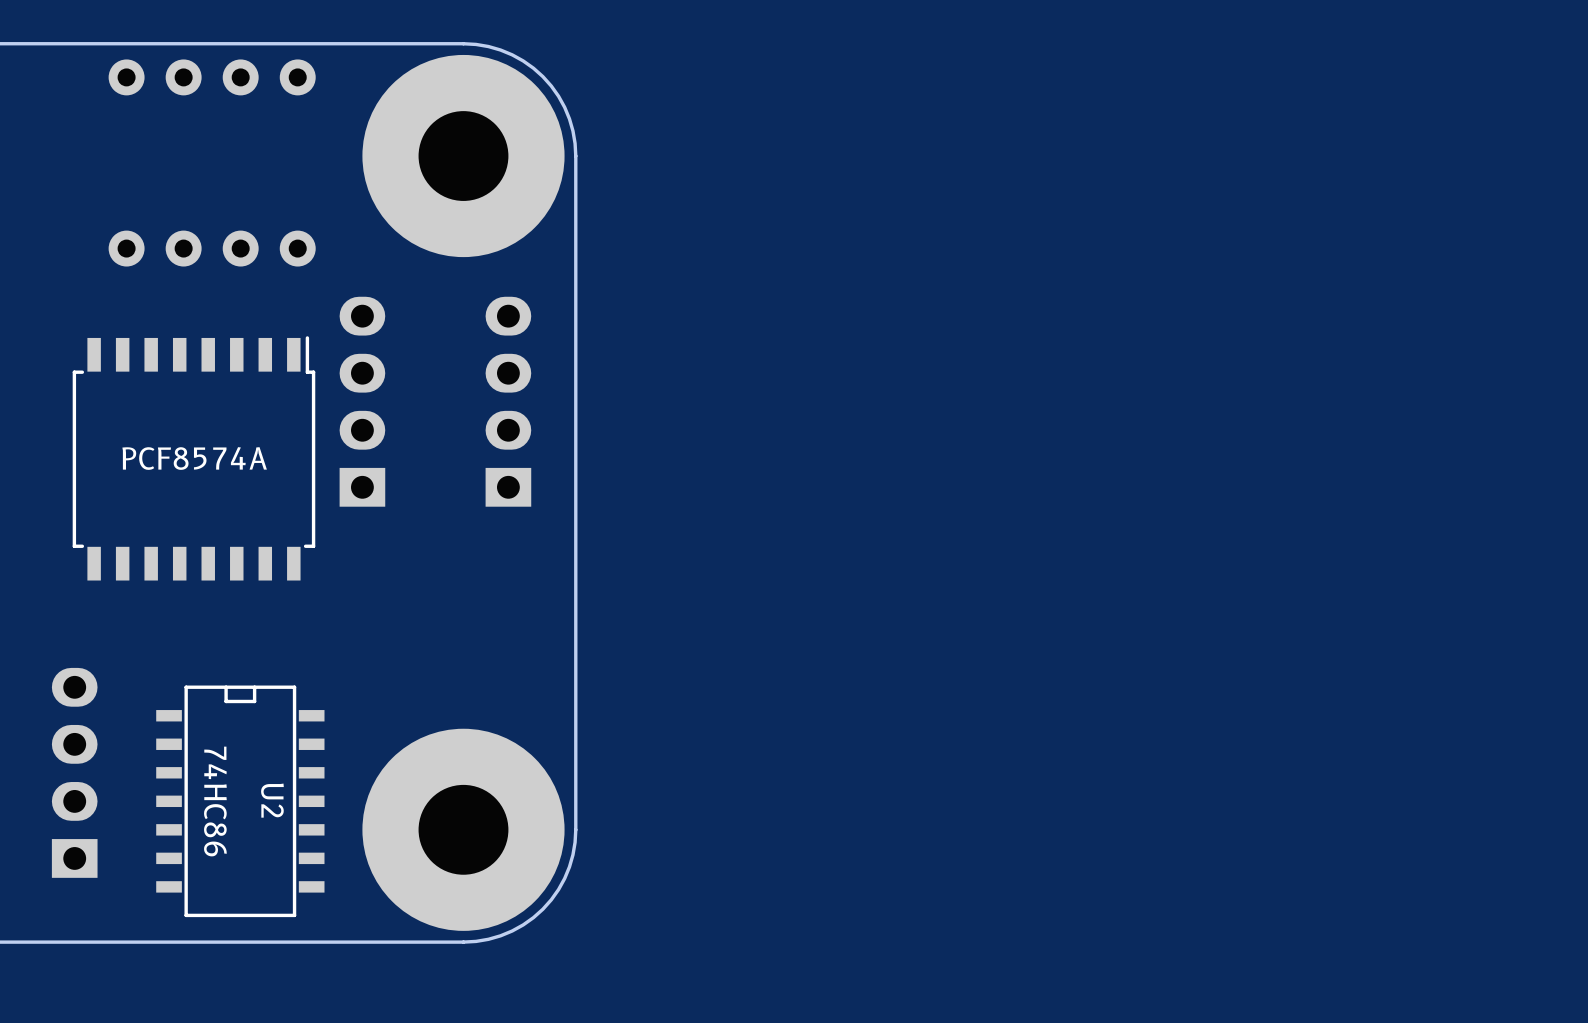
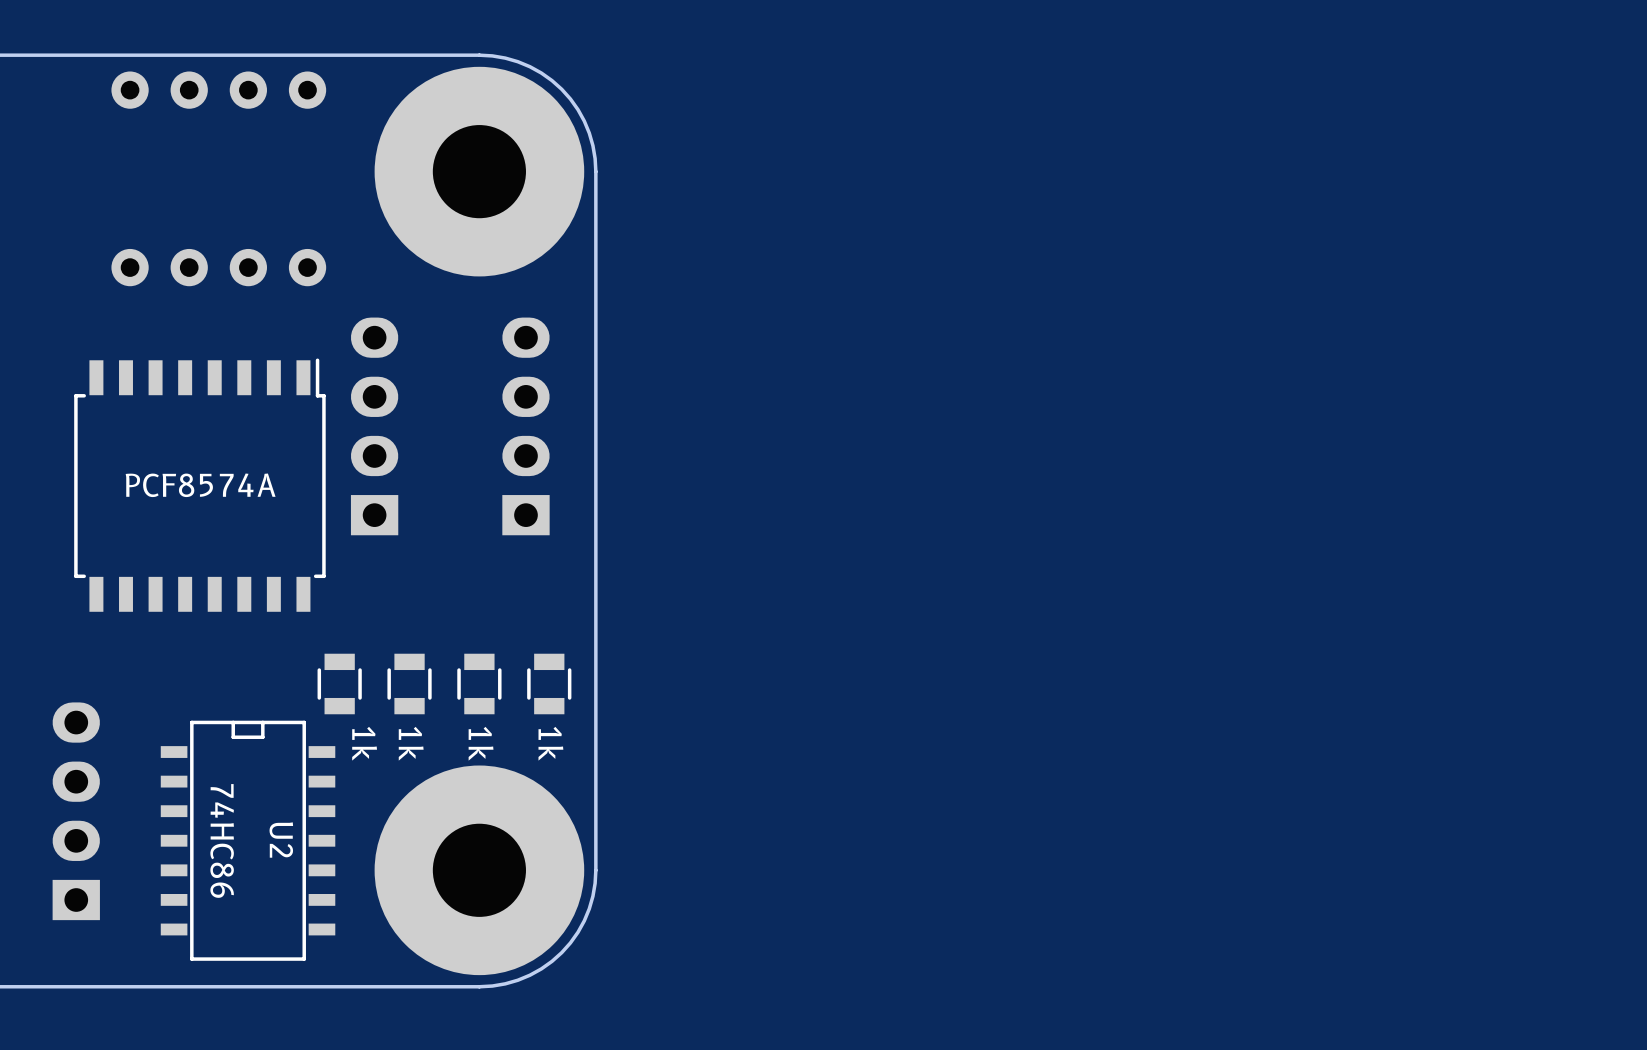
part: none -> 1k (339, 684)
part: none -> 1k (409, 684)
part: none -> 1k (479, 684)
part: none -> 1k (549, 684)

